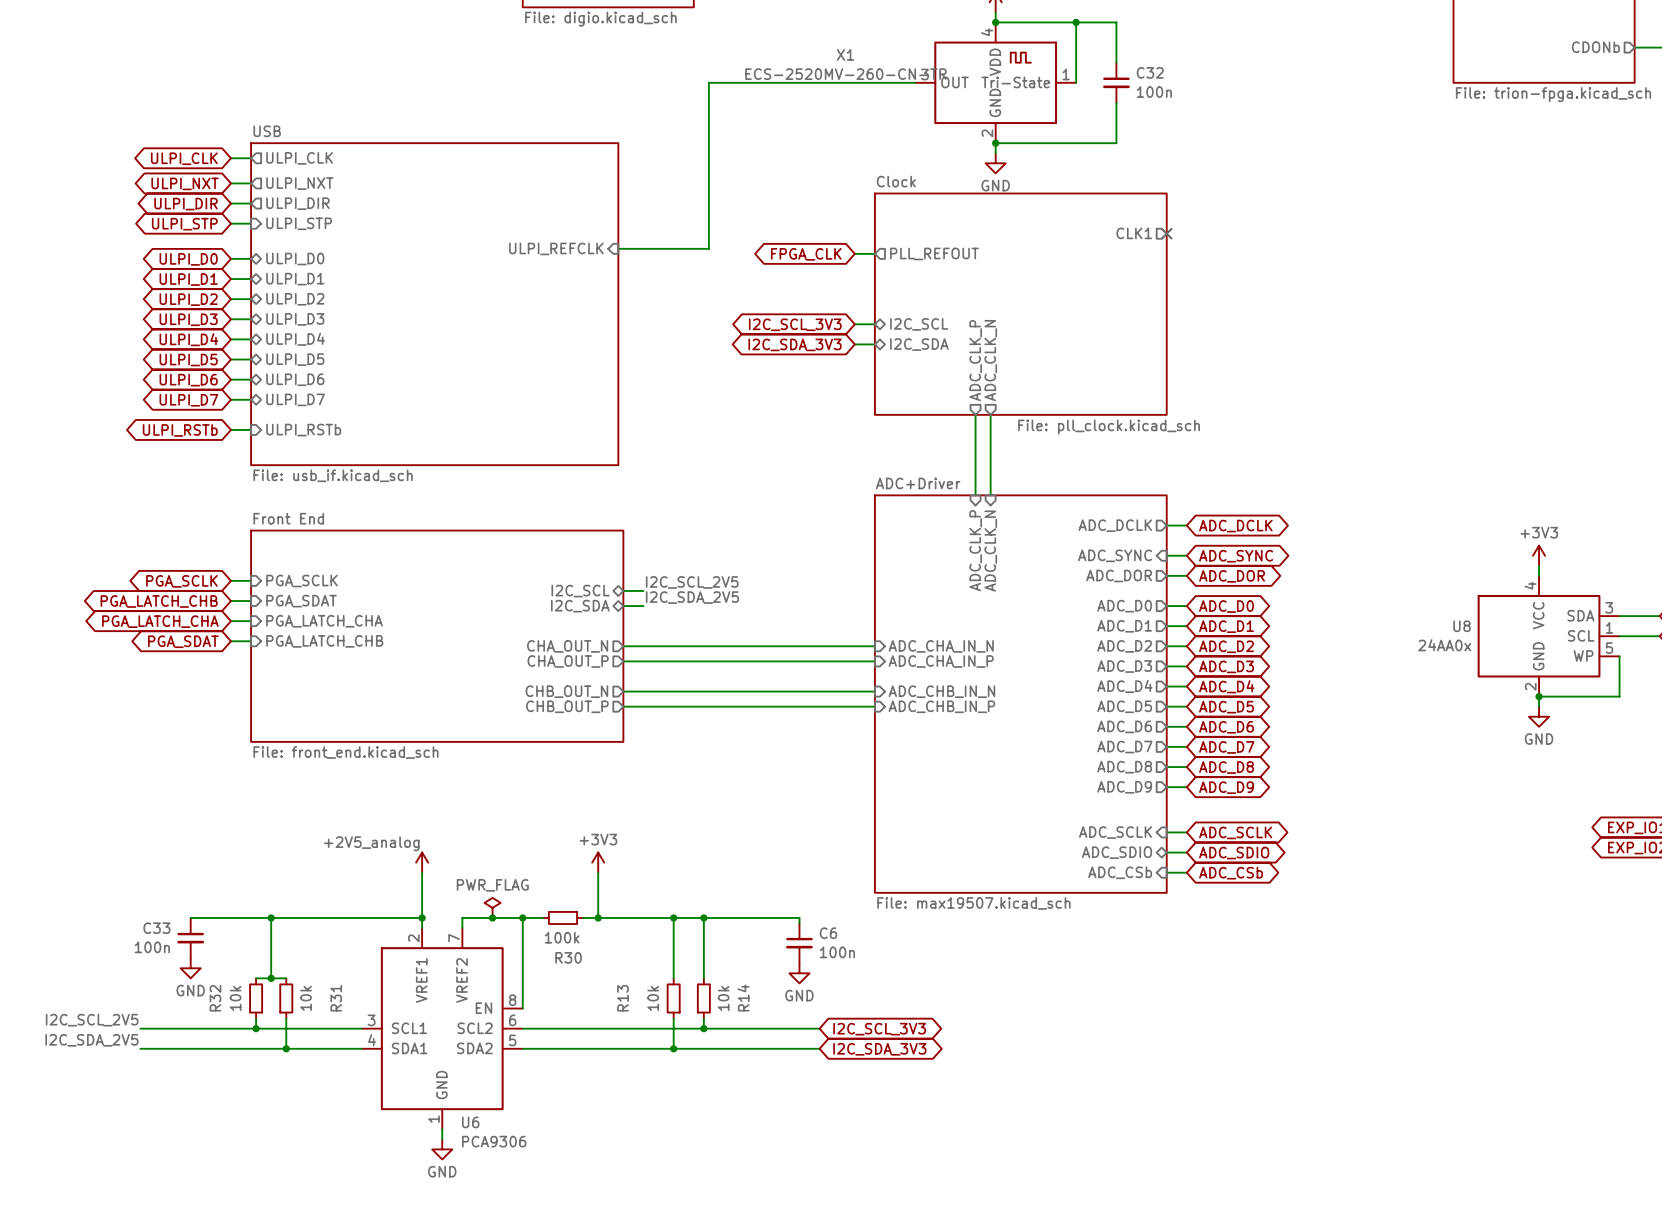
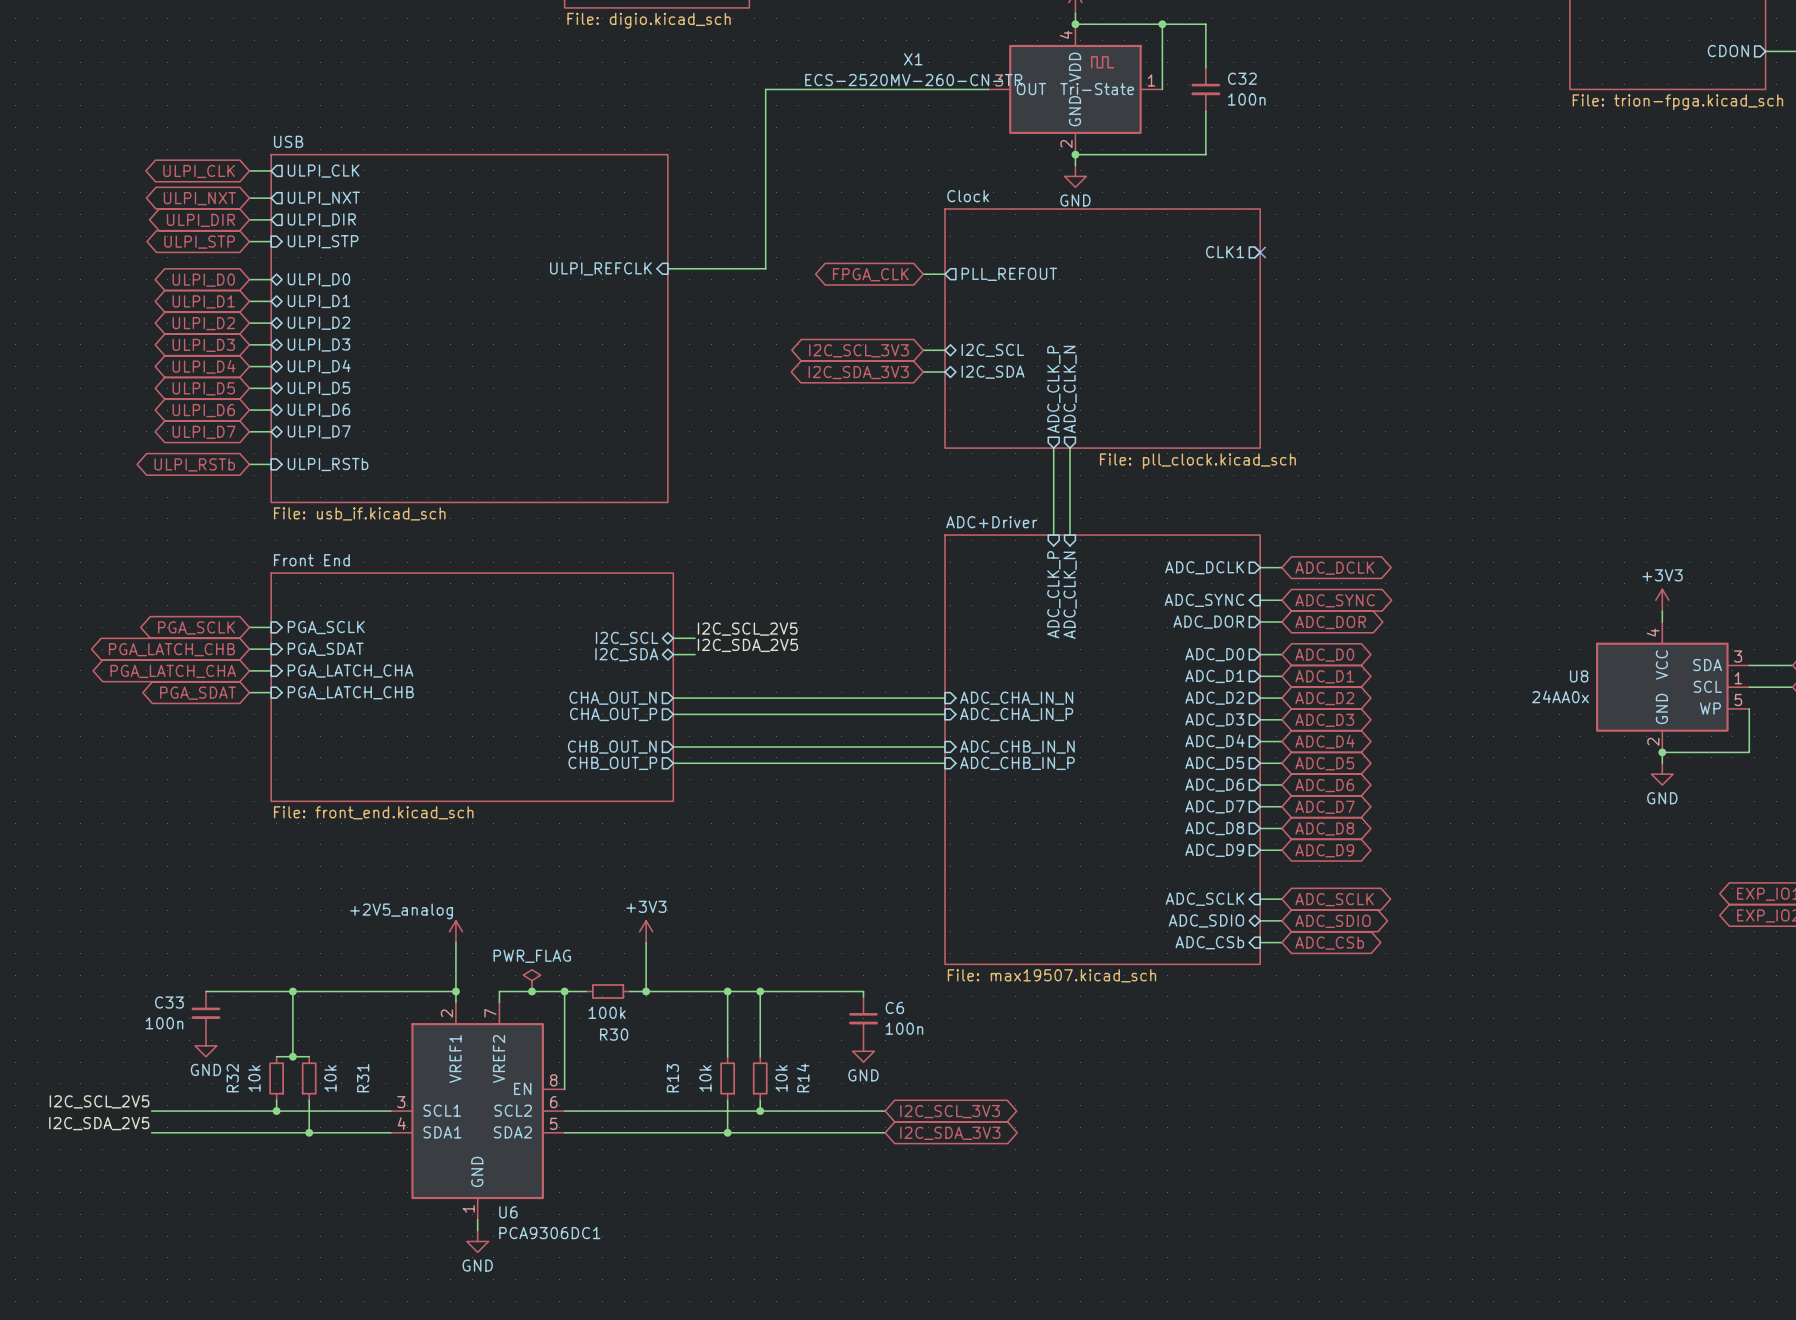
sheet pin: CDONb (1595, 47) -> CDON (1728, 51)
U6 value: PCA9306 (494, 1141) -> PCA9306DC1 (549, 1233)

